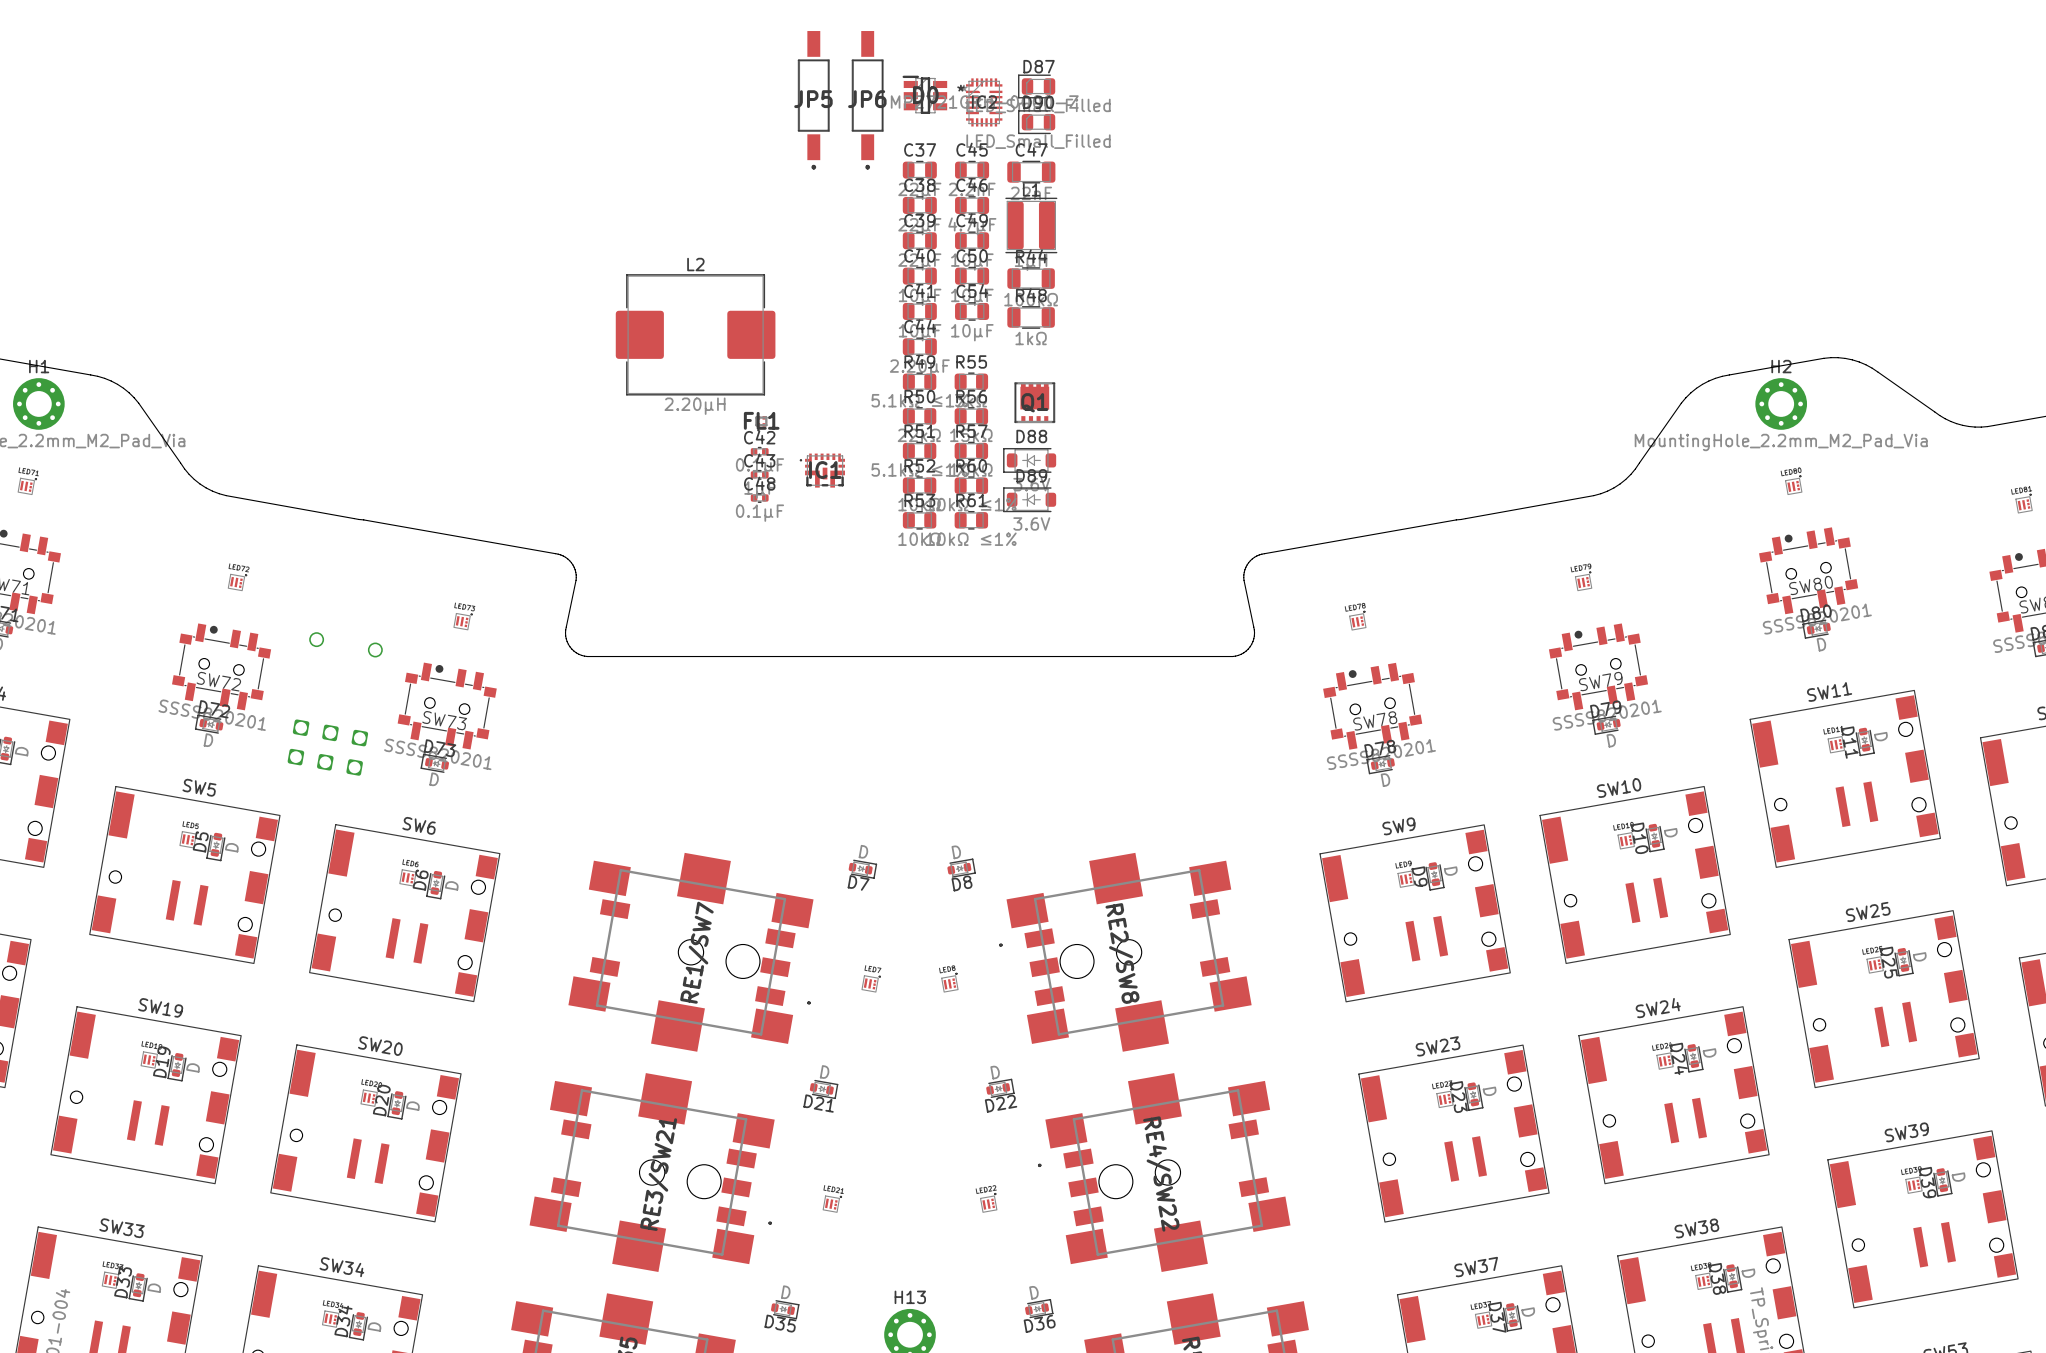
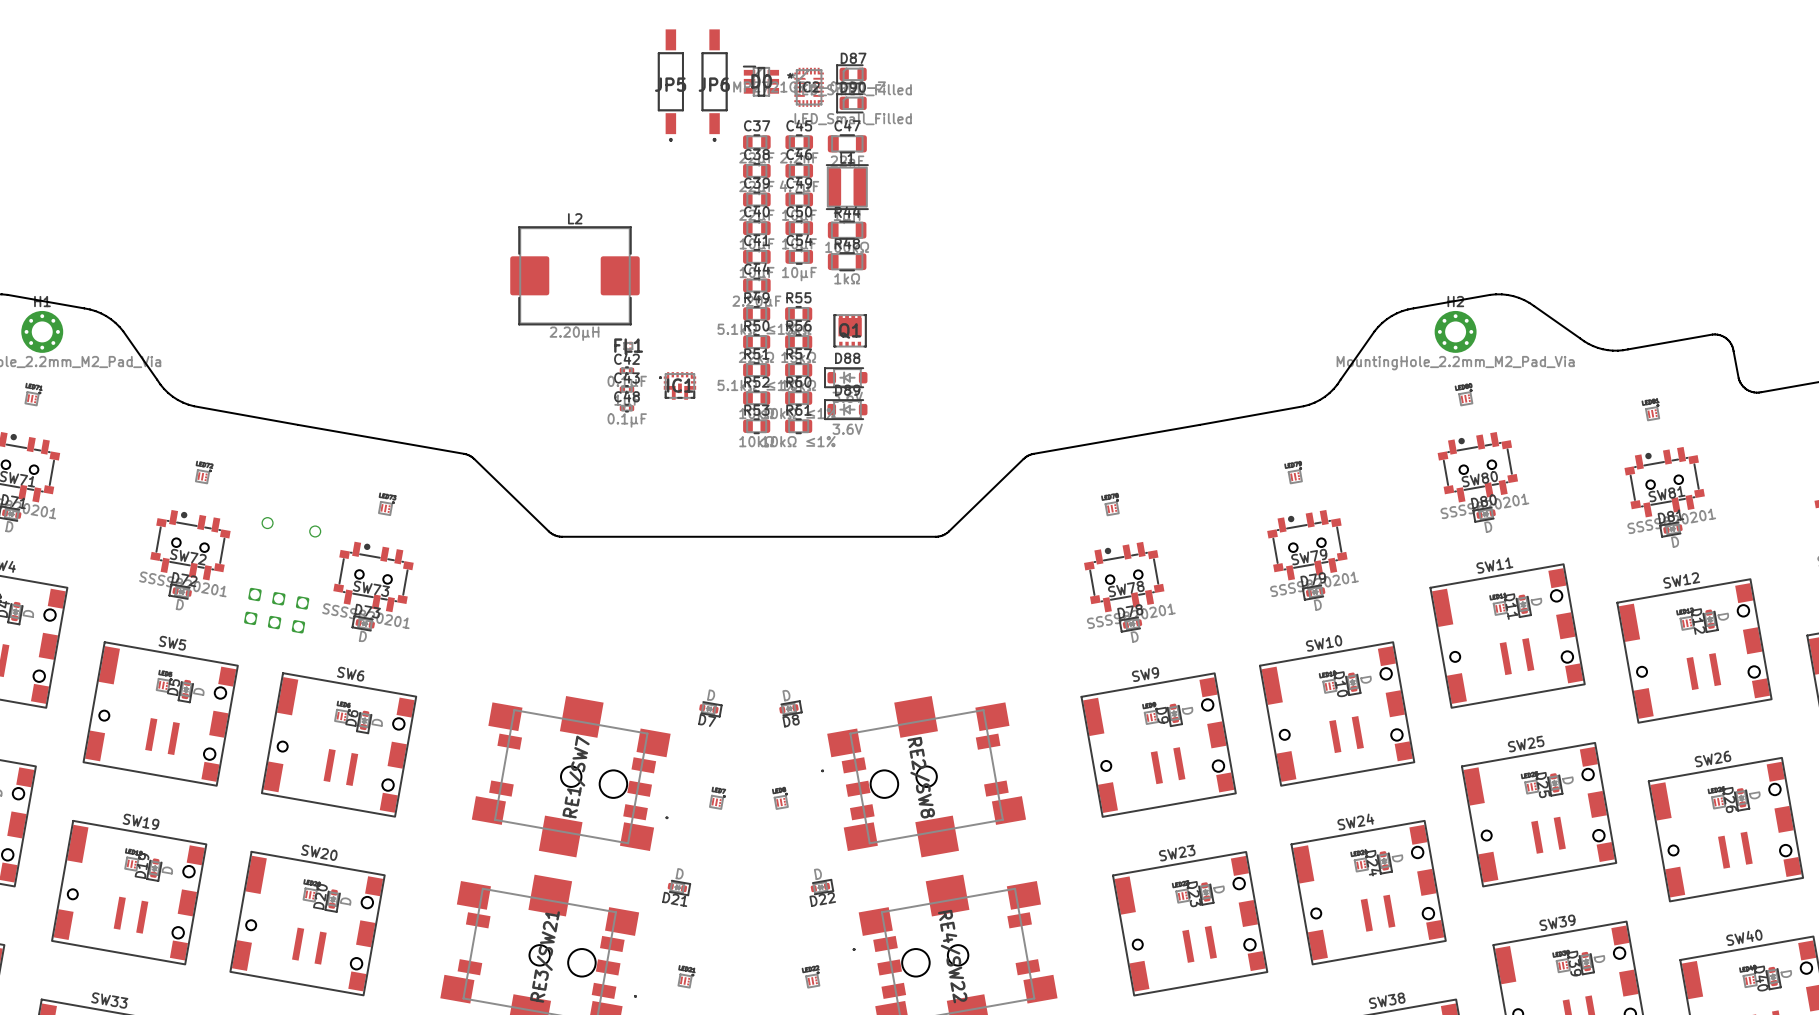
board edge: (354, 518) (560, 554) (571, 562) (576, 574) (565, 632) (568, 644) (573, 651) (587, 656) (679, 656) -> (297, 424) (467, 454) (548, 531) (562, 536)
board edge: (1465, 518) (1259, 554) (1248, 562) (1243, 574) (1254, 632) (1251, 644) (1246, 651) (1232, 656) (1140, 656) -> (1199, 424) (1029, 454) (949, 531) (935, 536)

